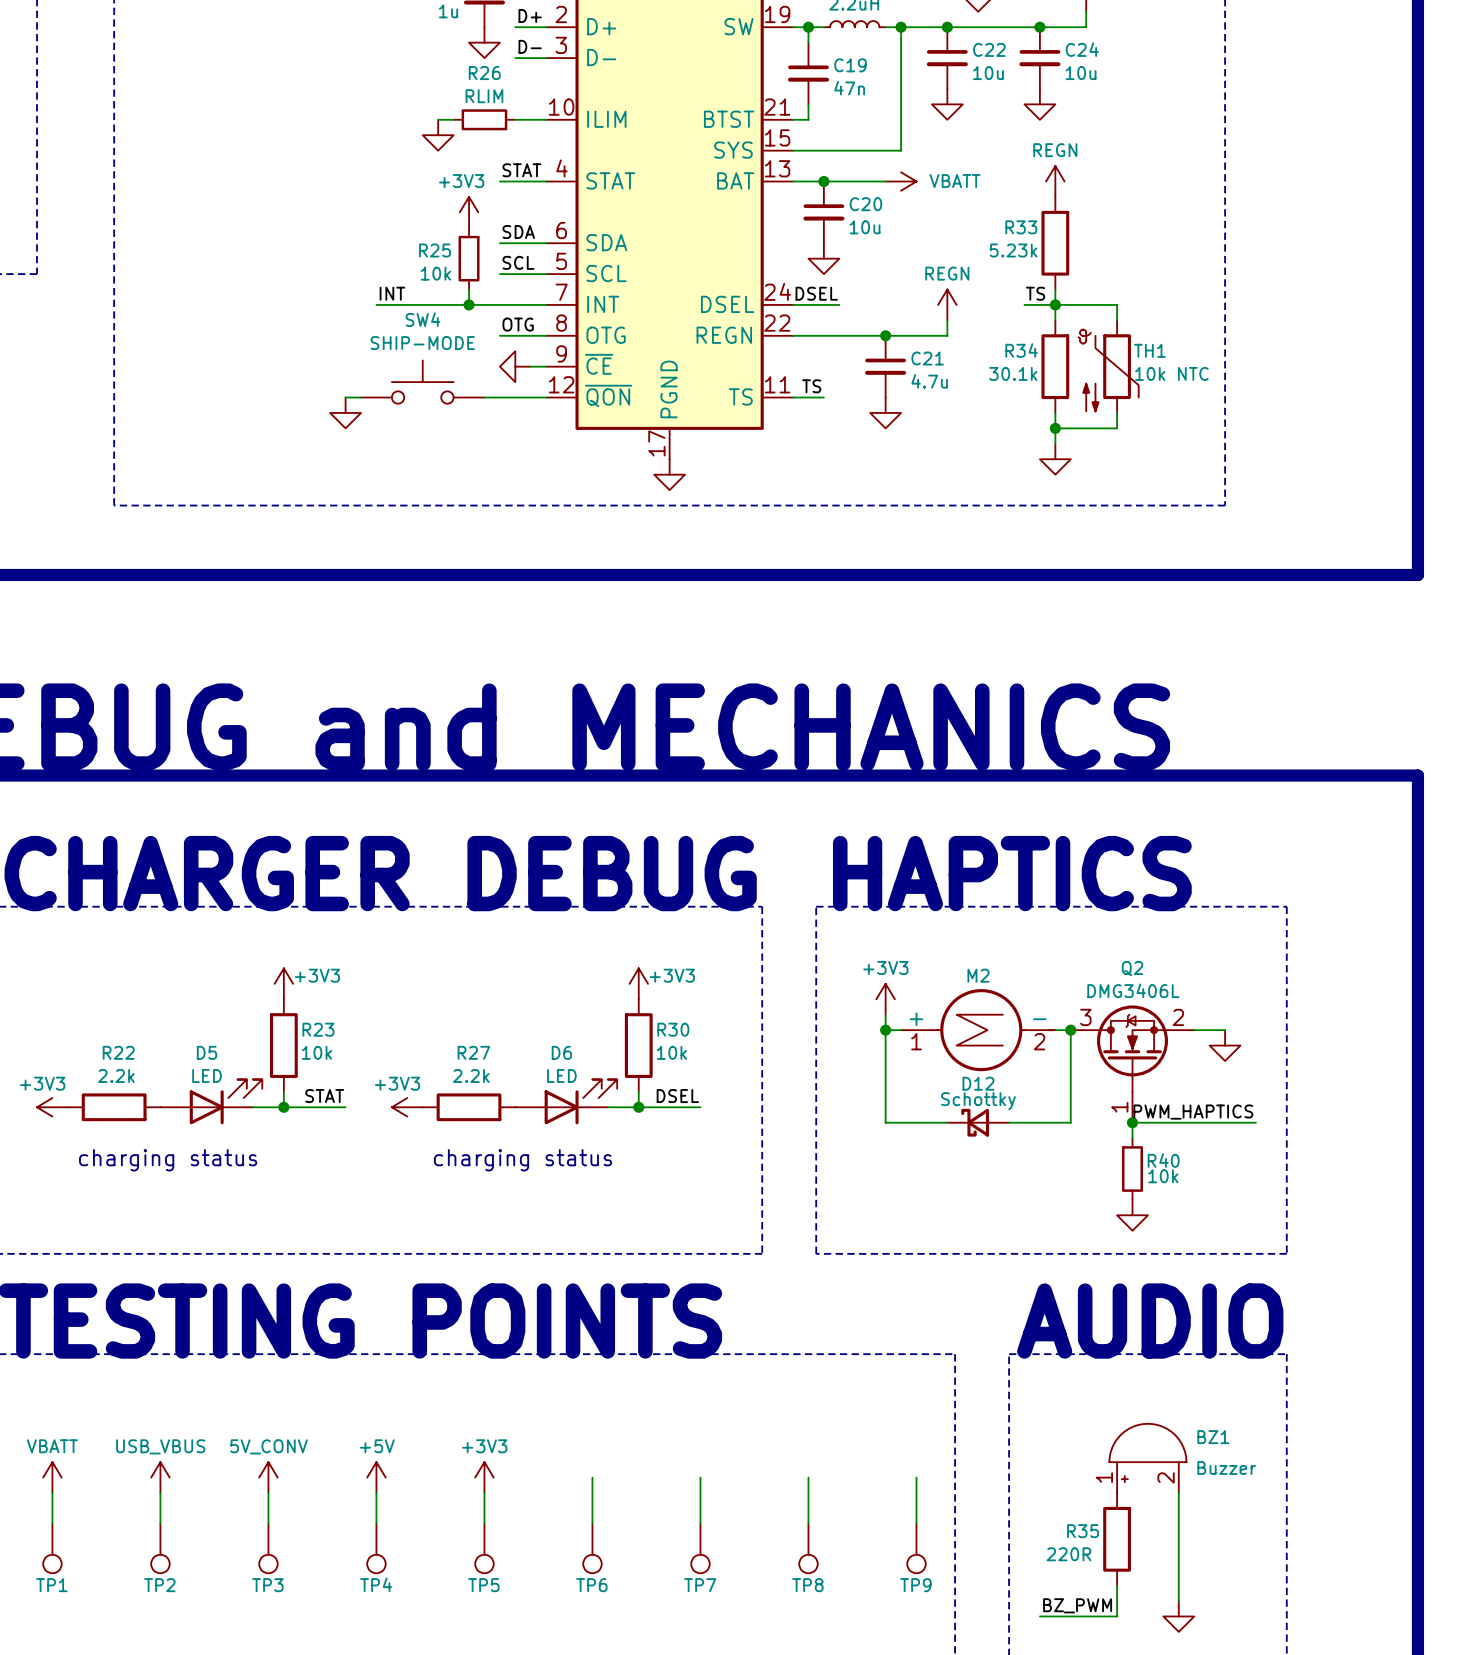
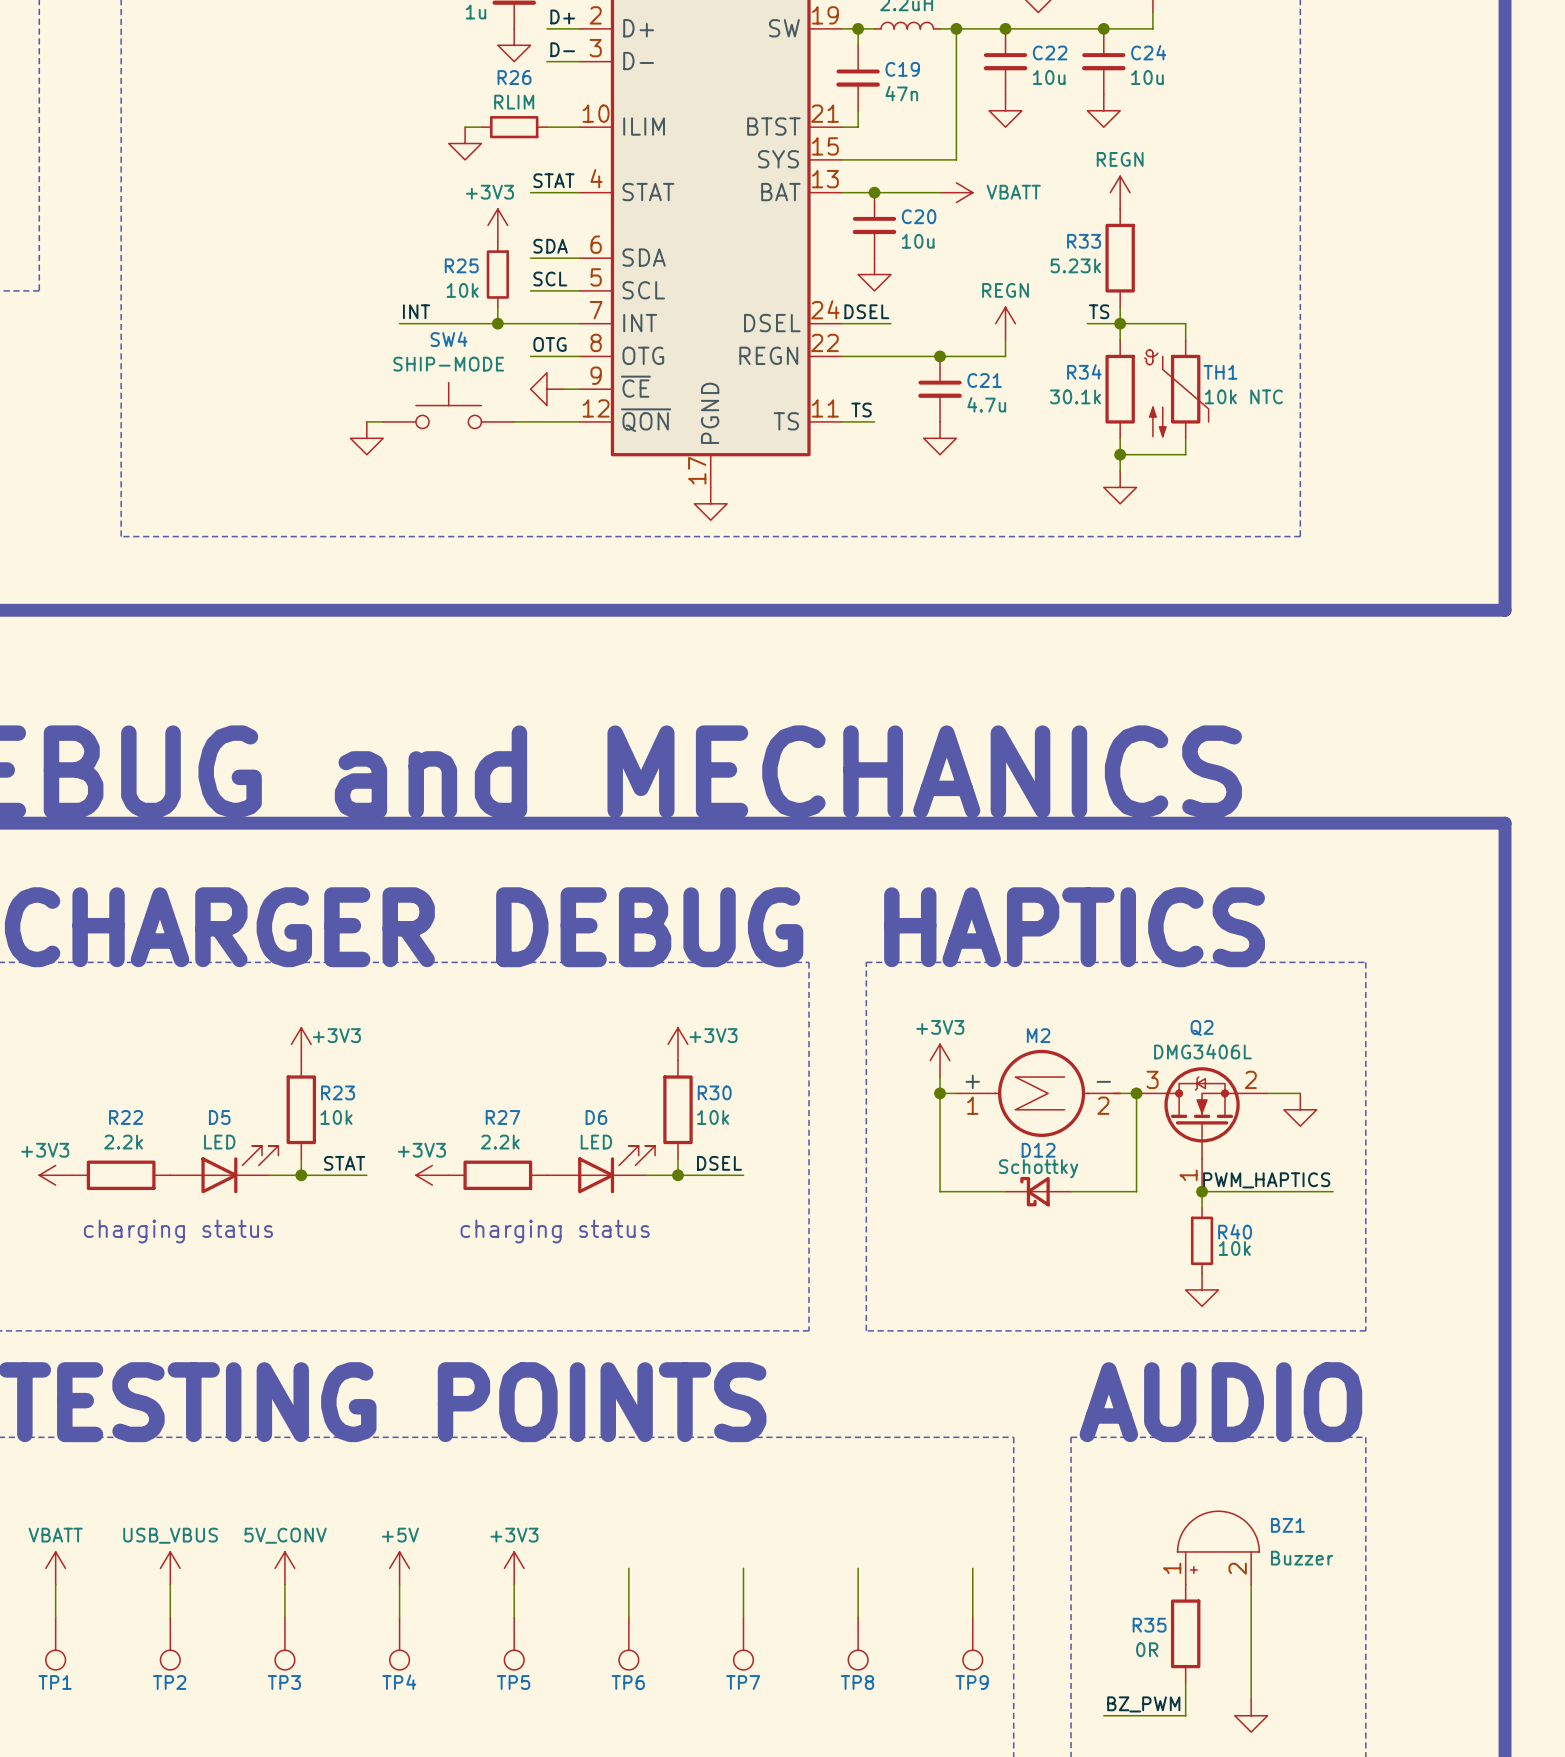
R35 value: 220R (1068, 1554) -> 0R (1147, 1649)

